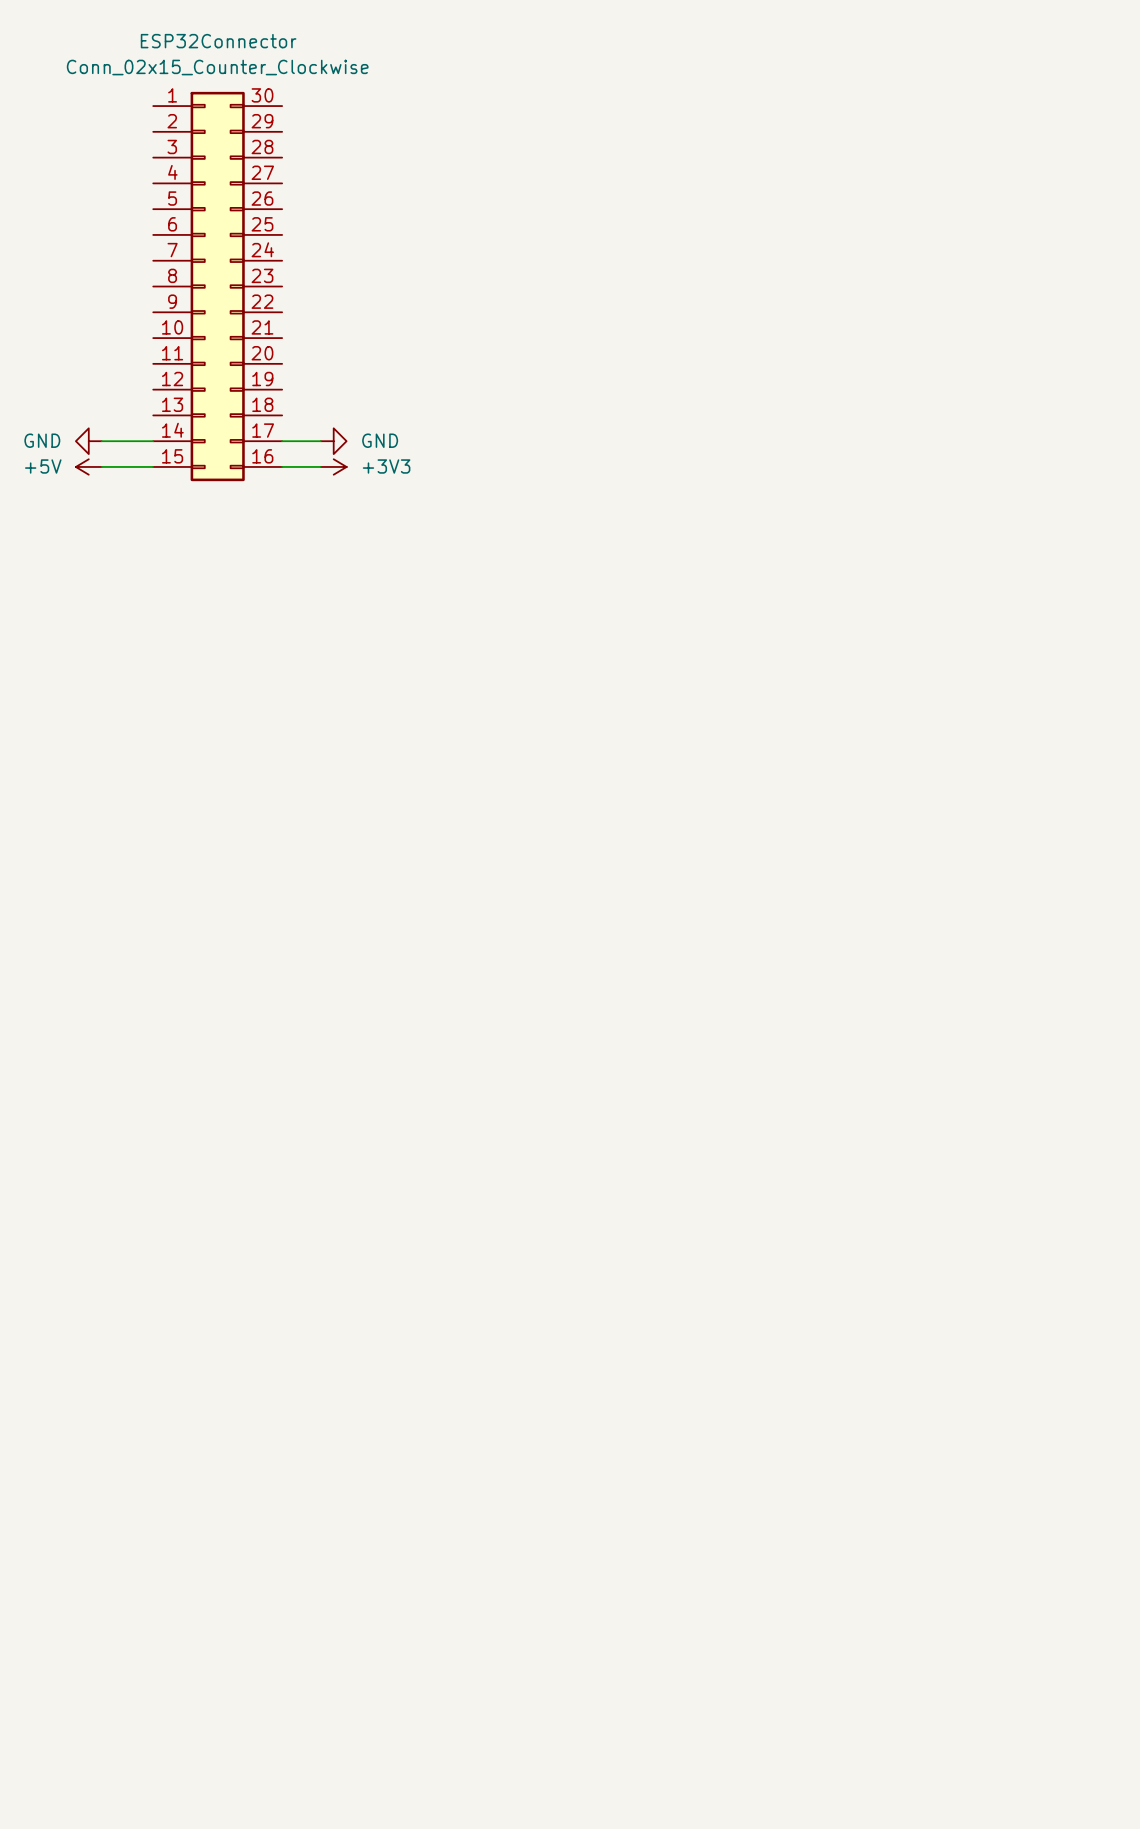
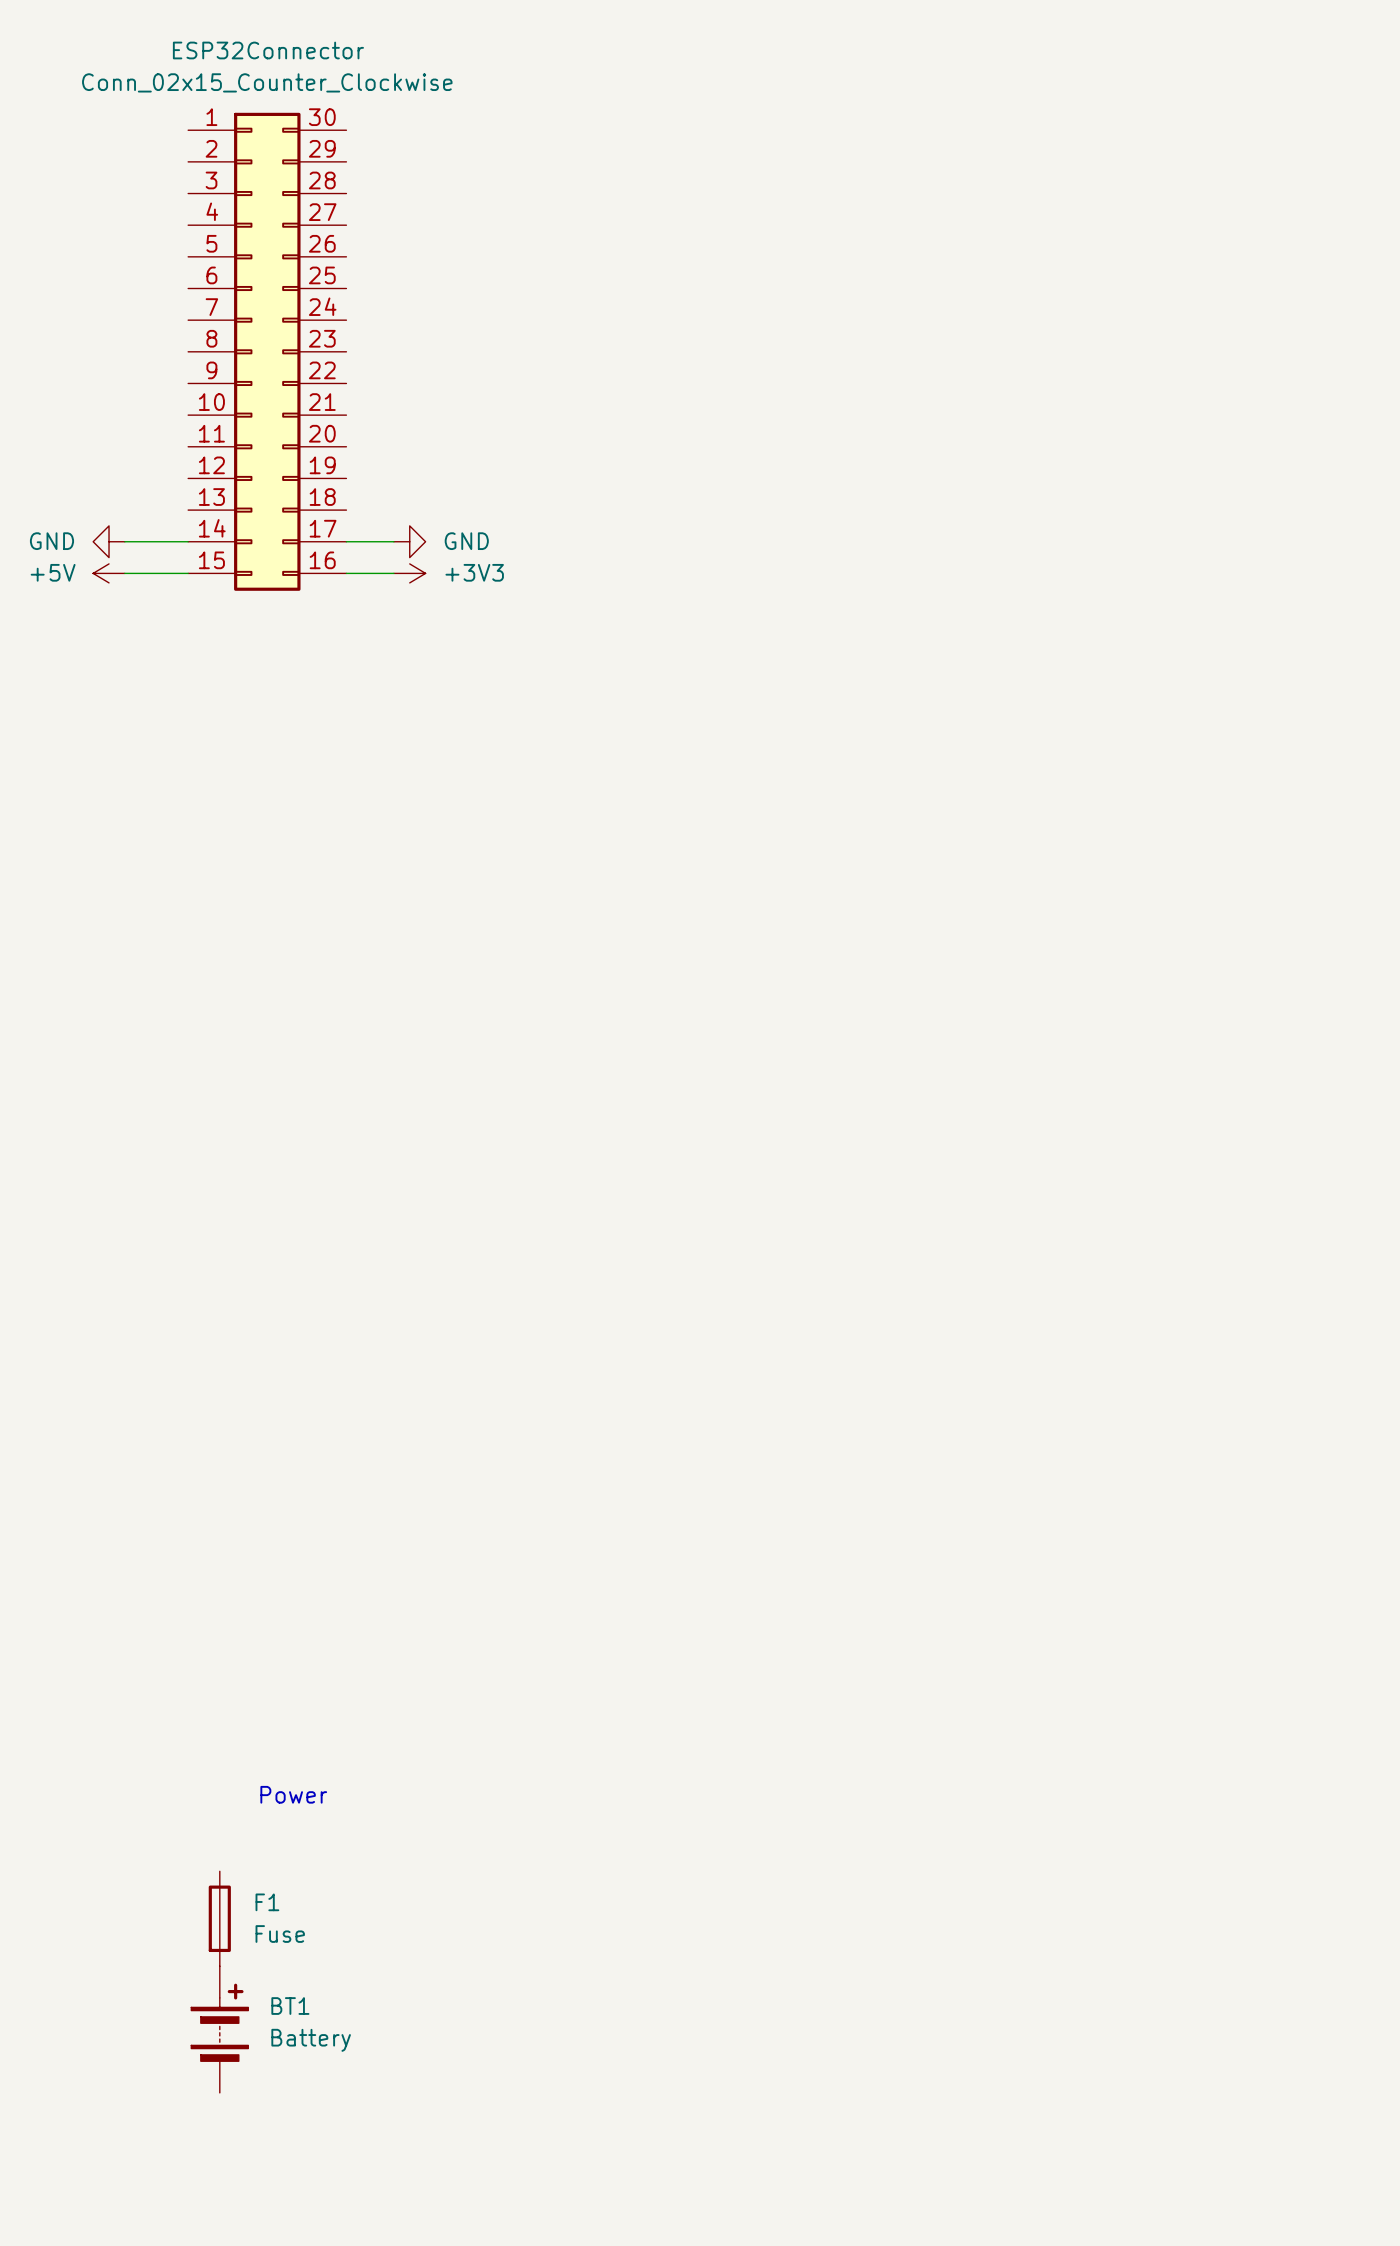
text: none -> Power (293, 1794)
F1: none -> Fuse (219, 1918)
BT1: none -> Battery (219, 2029)

